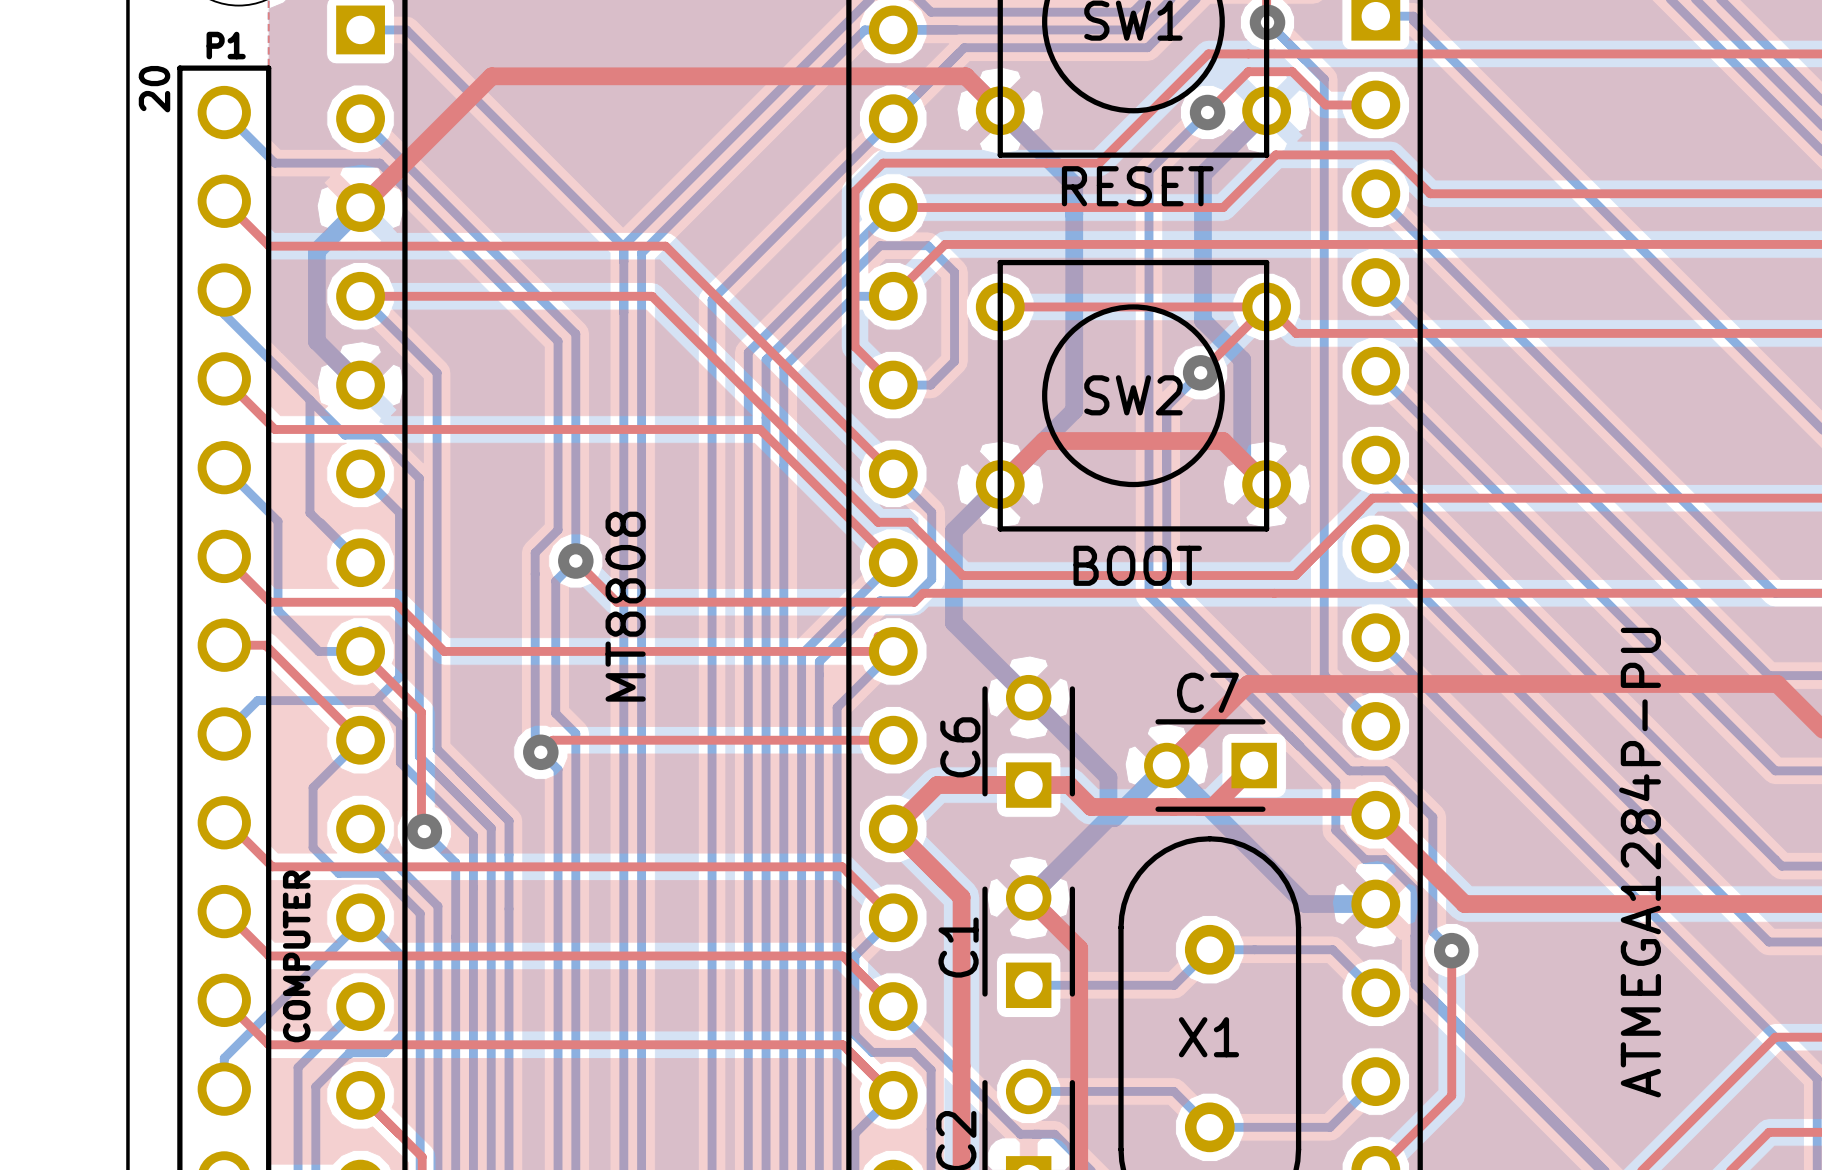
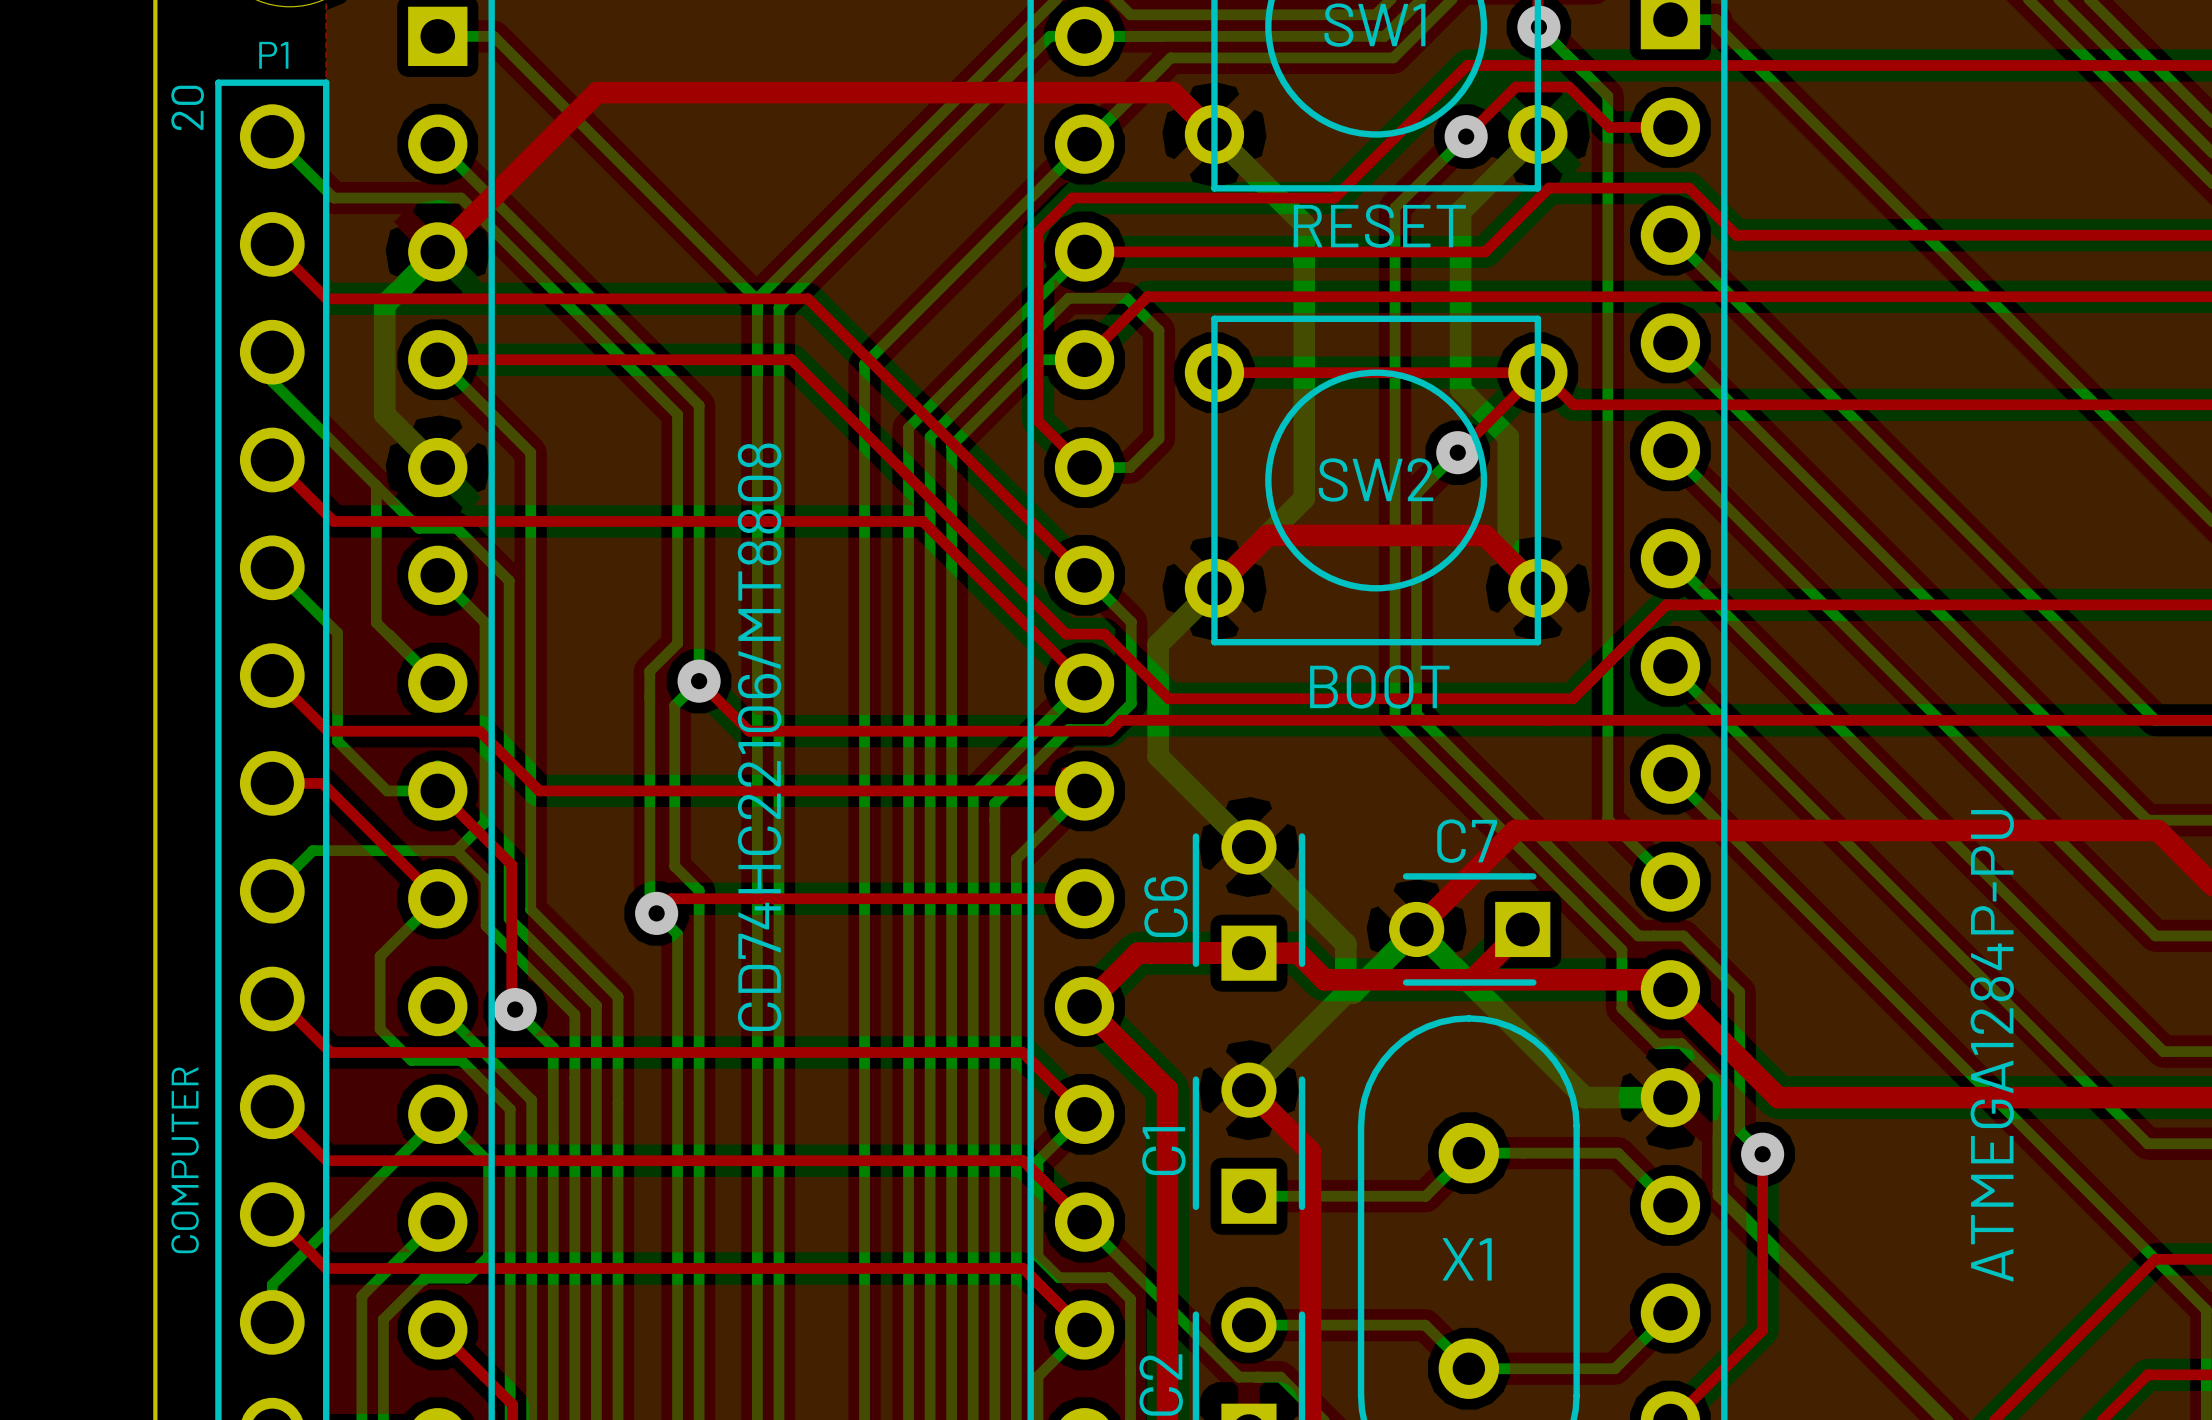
part value: MT8808 (625, 606) -> CD74HC22106/MT8808 (759, 737)
P1 value position: COMPUTER (296, 956) -> COMPUTER (185, 1160)

